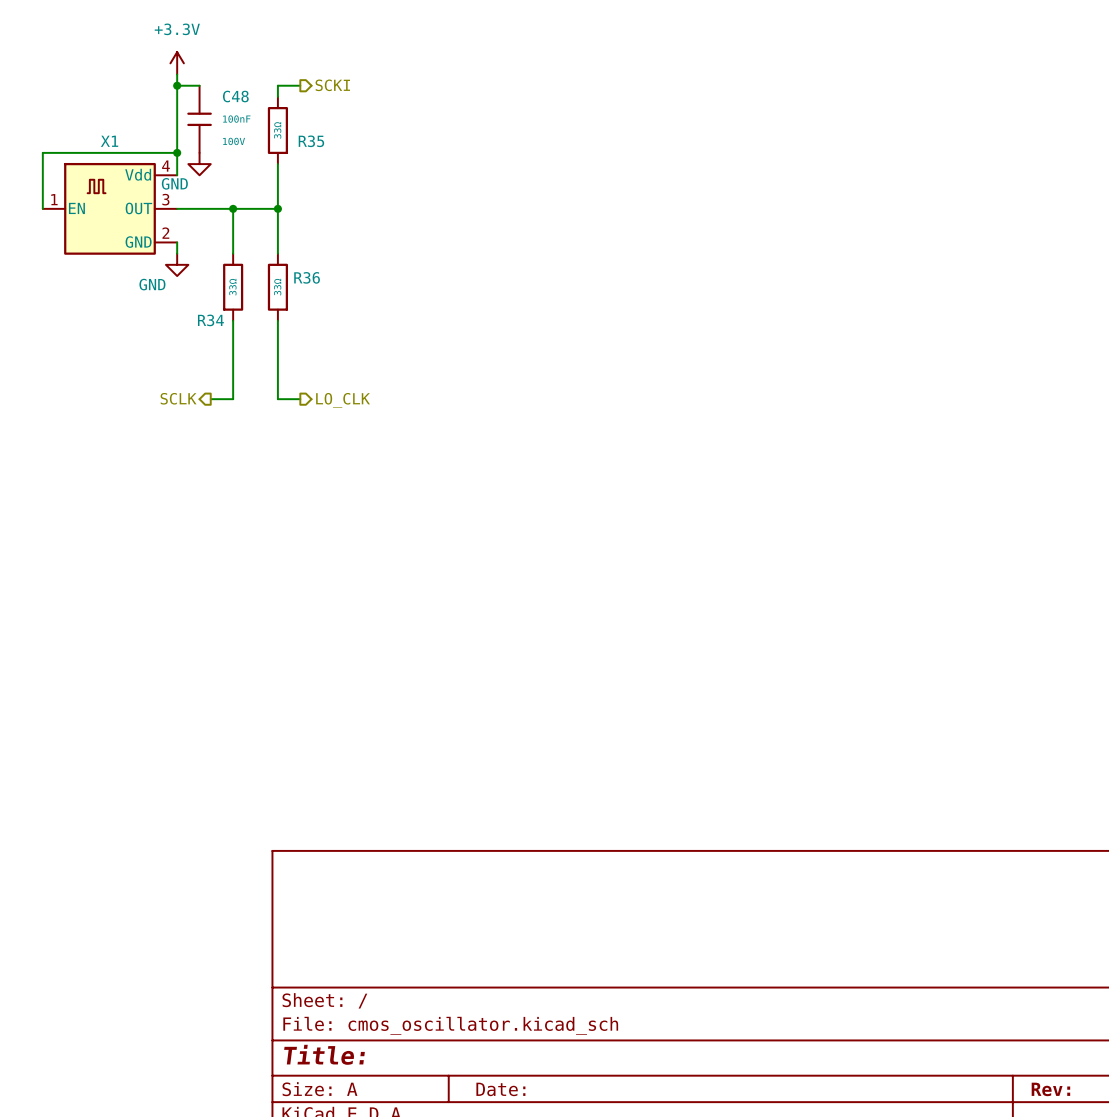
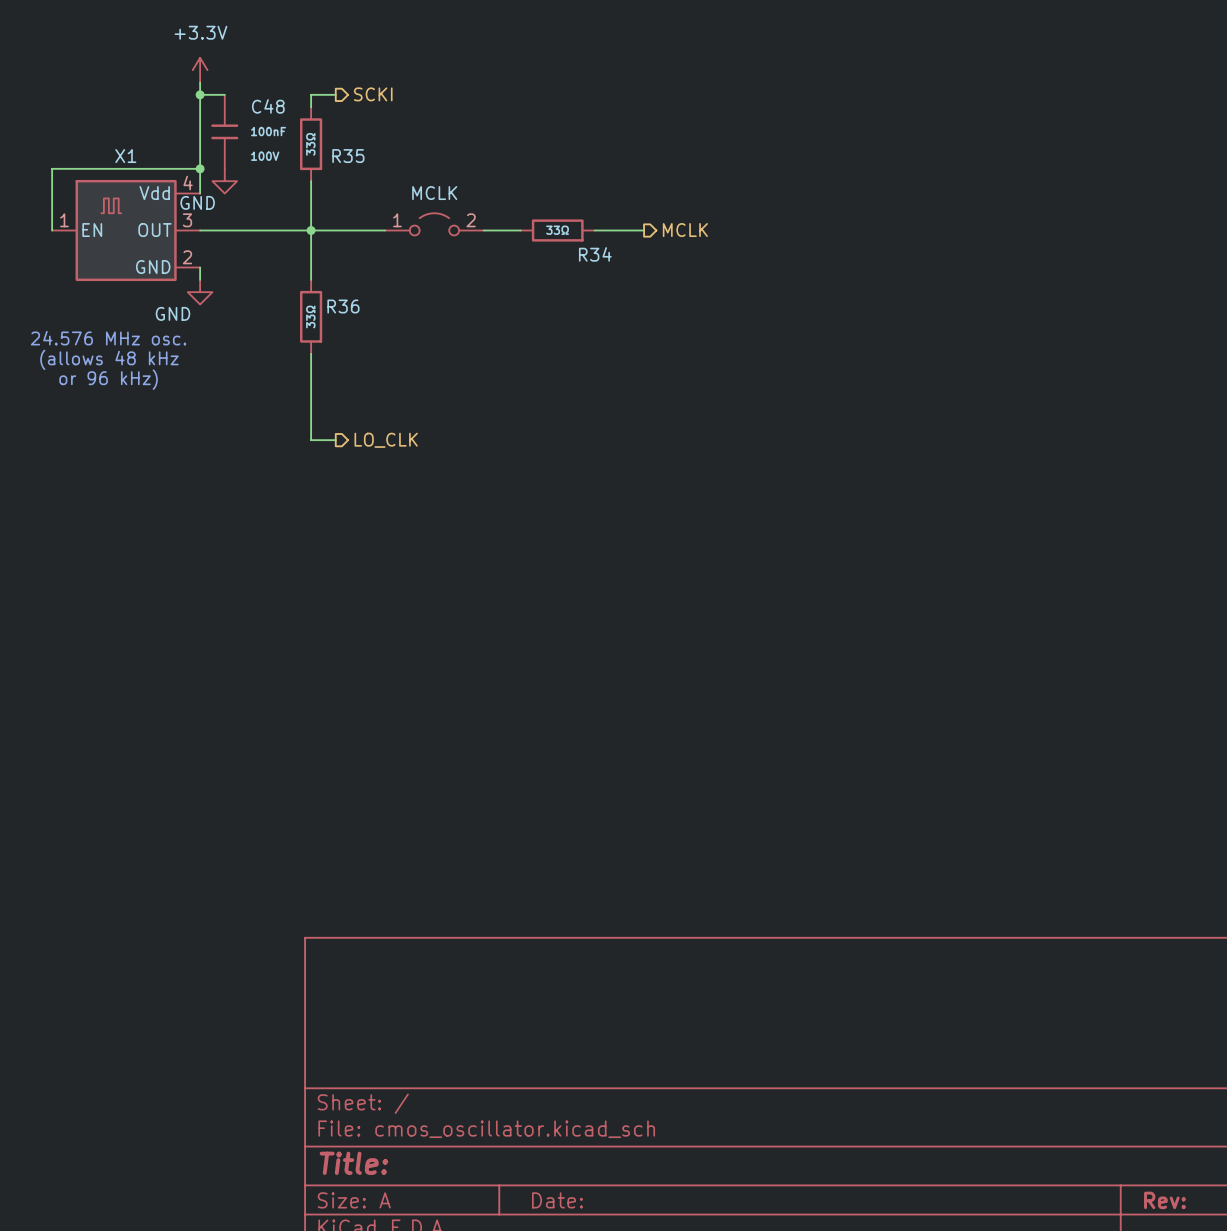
part: none -> MCLK (434, 224)
wire: (233, 208) (233, 253) -> none
junction: (233, 208) -> none
wire: none -> (311, 230) (385, 230)
wire: none -> (483, 230) (520, 230)
wire: none -> (594, 230) (644, 230)
hierarchical label: none -> MCLK (685, 230)
R34 rotation: 0° (233, 287) -> 90° clockwise (557, 230)
R34 position: (233, 287) -> (557, 230)
text: none -> 24.576 MHz osc. (108, 338)
R34 name position: R34 (210, 320) -> R34 (595, 254)
wire: (233, 320) (233, 399) (210, 399) -> none
text: none -> (allows 48 kHz (109, 359)
text: none -> or 96 kHz) (108, 379)
hierarchical label: SCLK (178, 398) -> none

